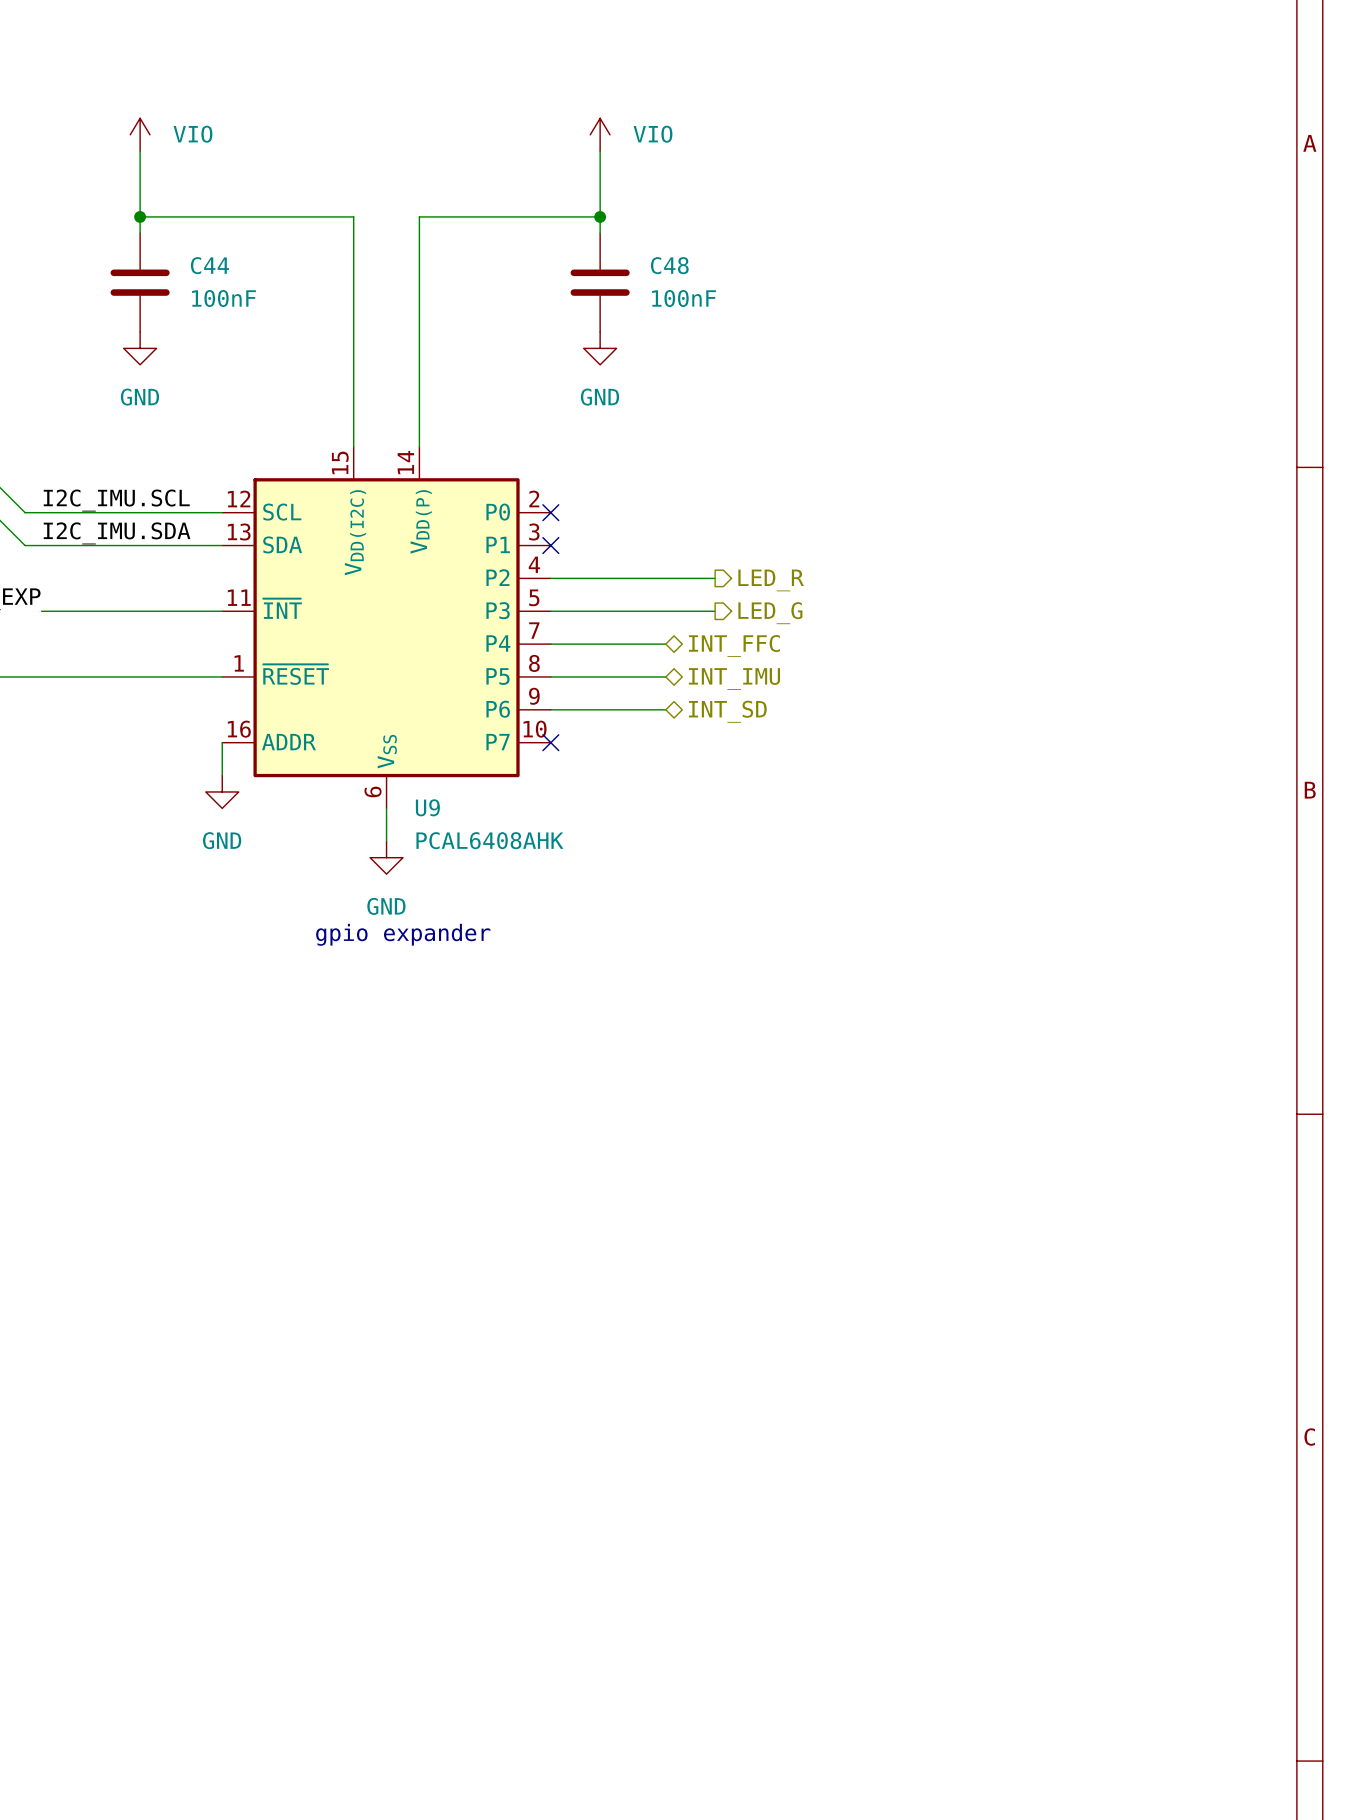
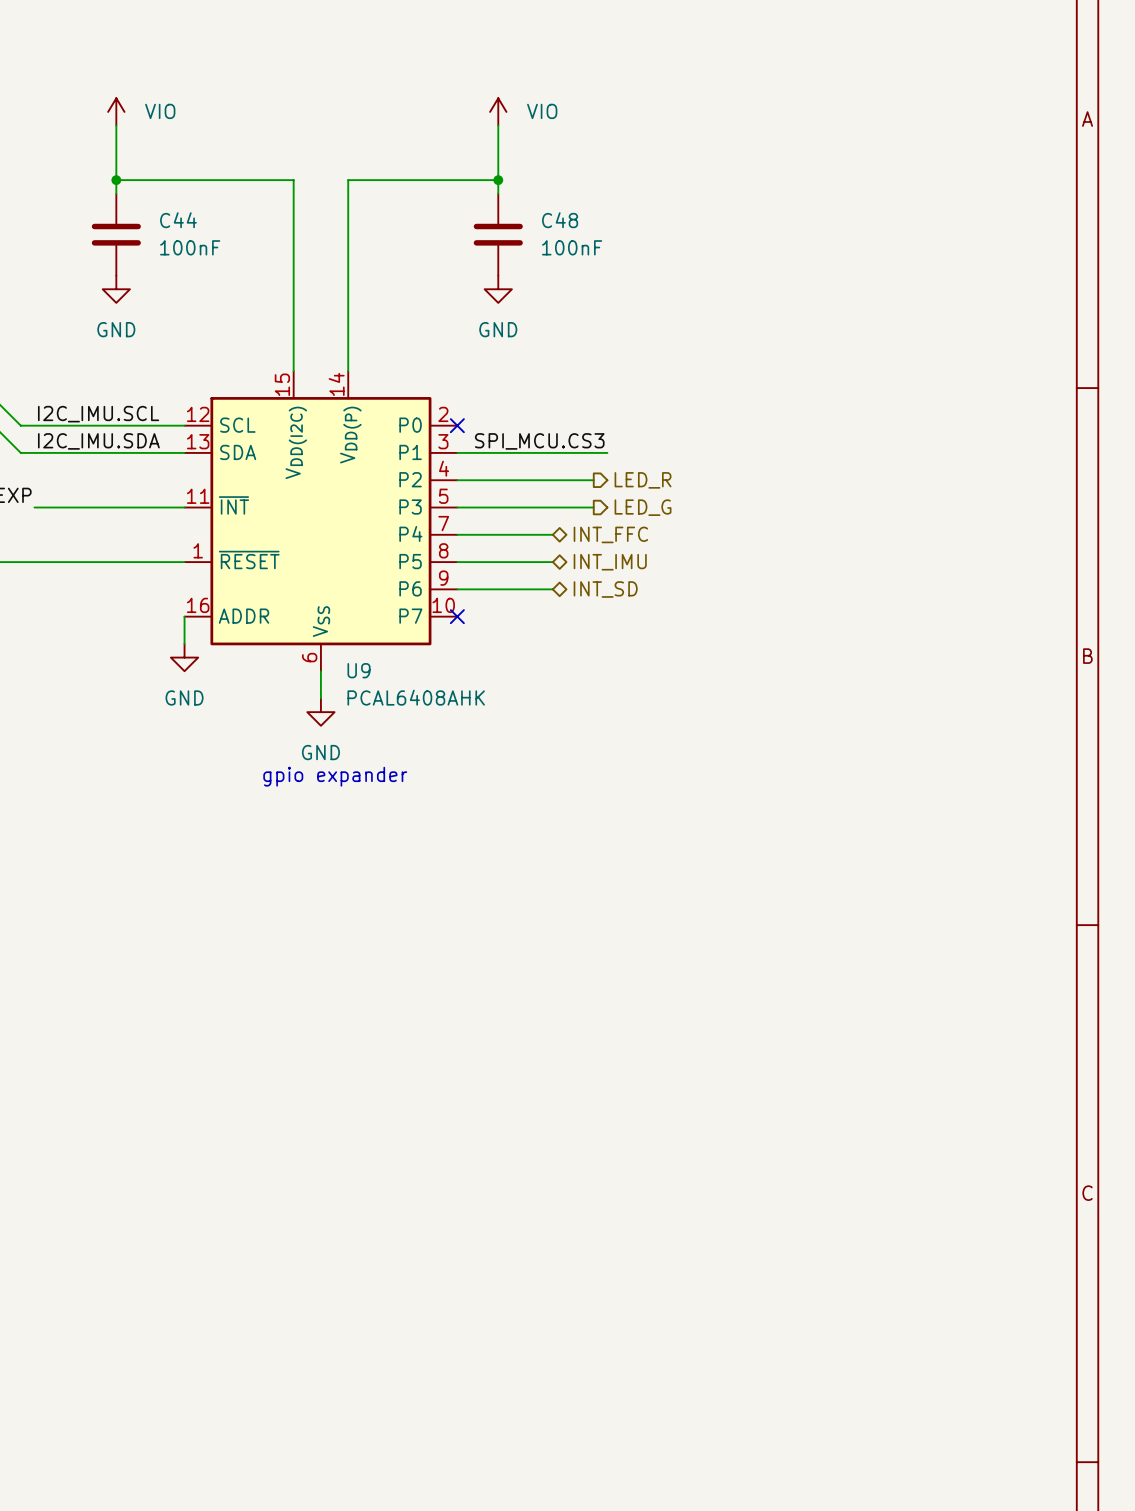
label: none -> SPI_MCU.CS3 (539, 441)
wire: none -> (457, 452) (607, 452)
no-connect mark: (550, 545) -> none

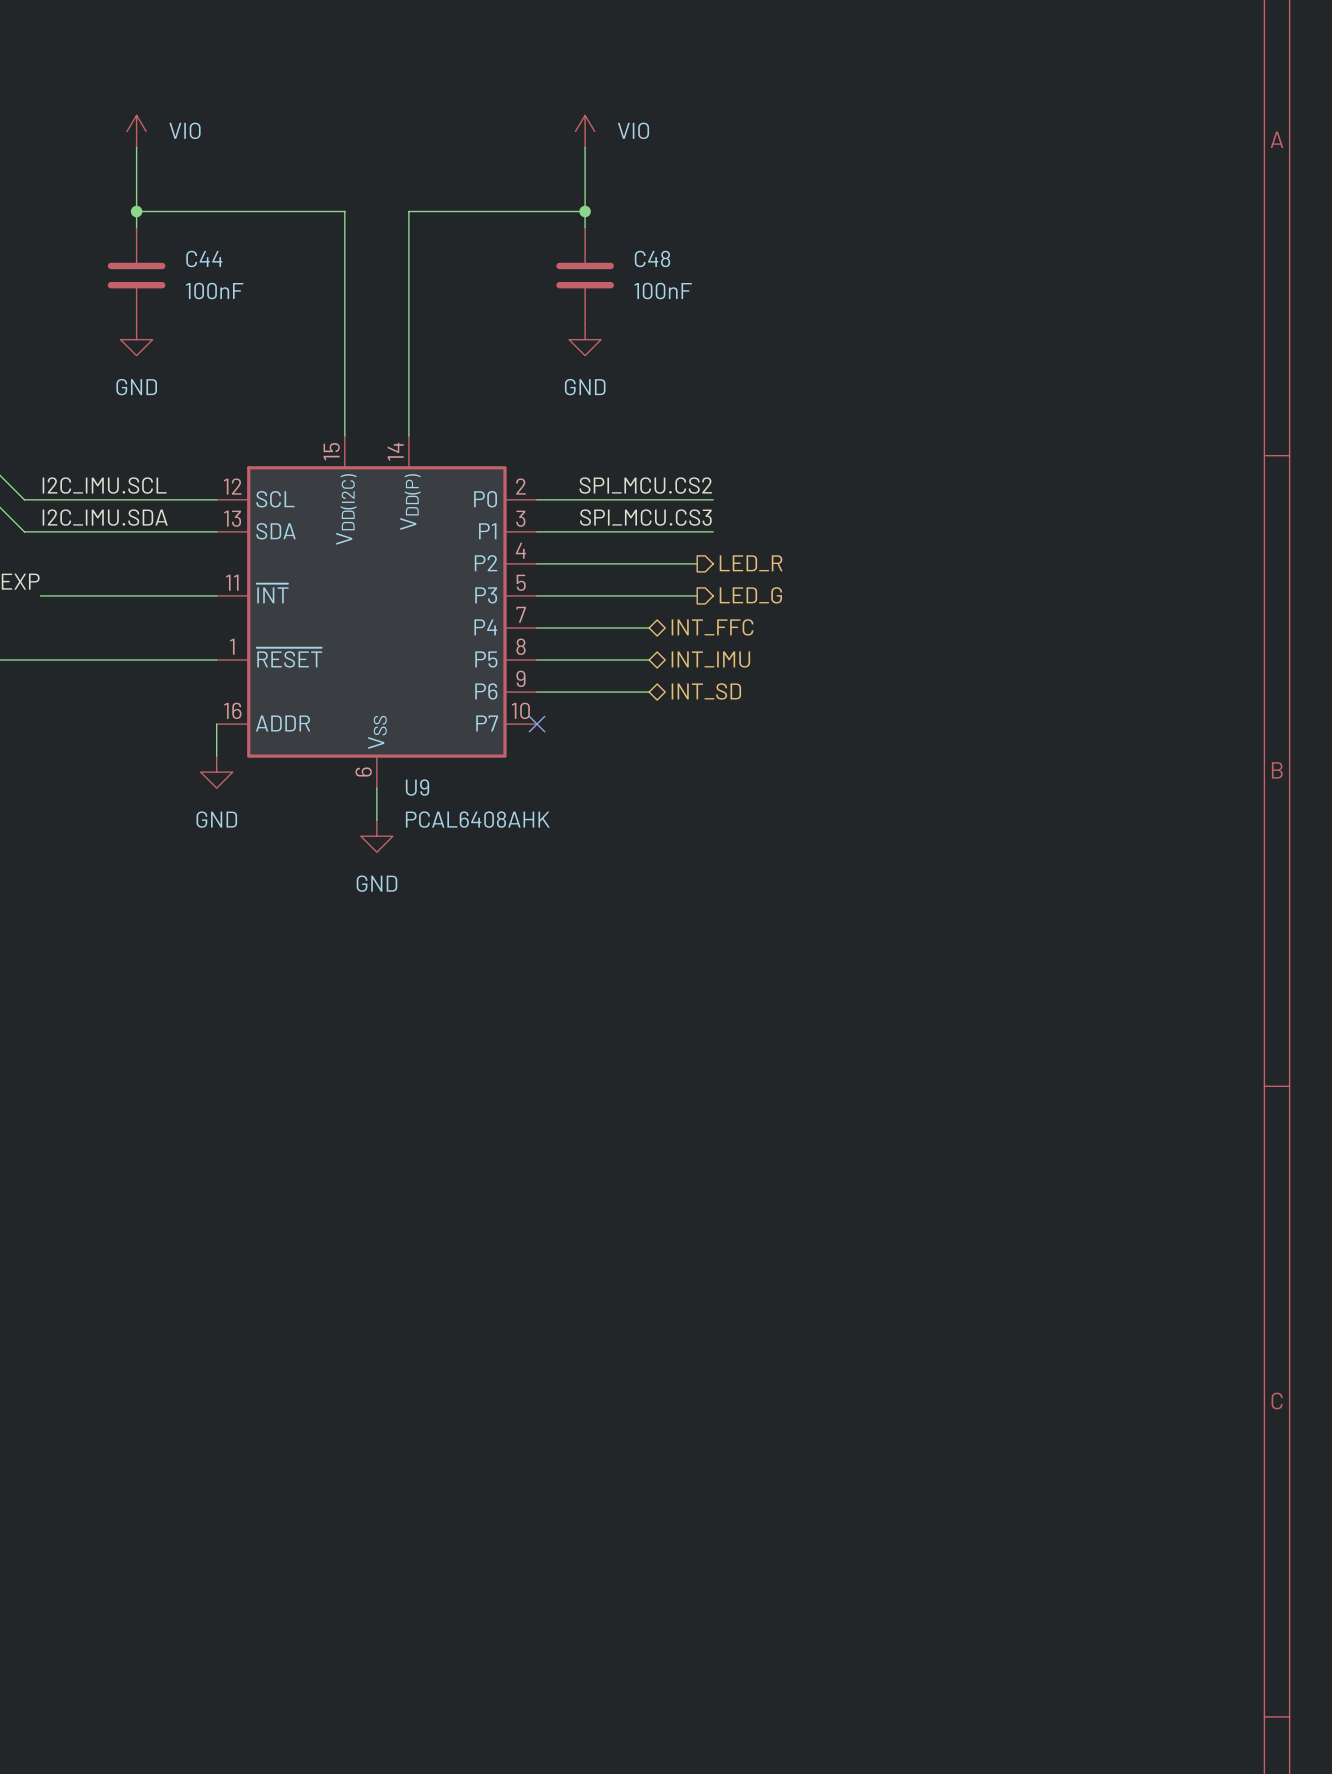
label: none -> SPI_MCU.CS2 (645, 485)
wire: none -> (537, 499) (713, 499)
no-connect mark: (457, 425) -> none
text: gpio expander (335, 776) -> none

